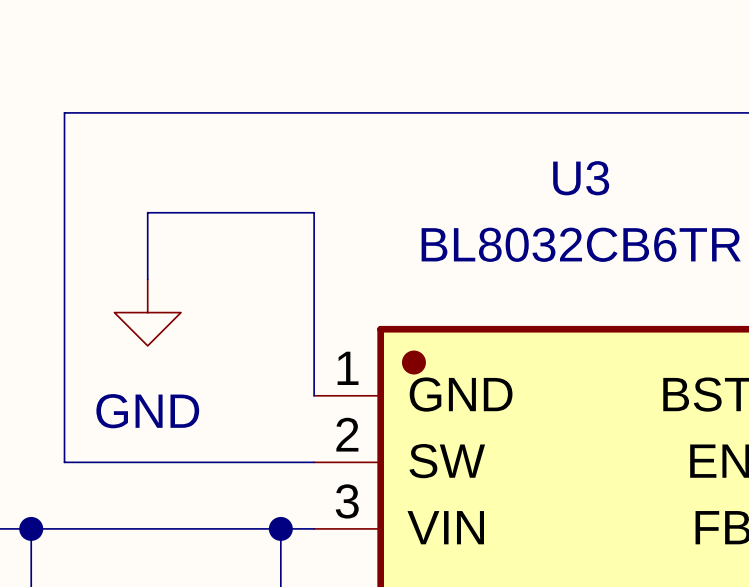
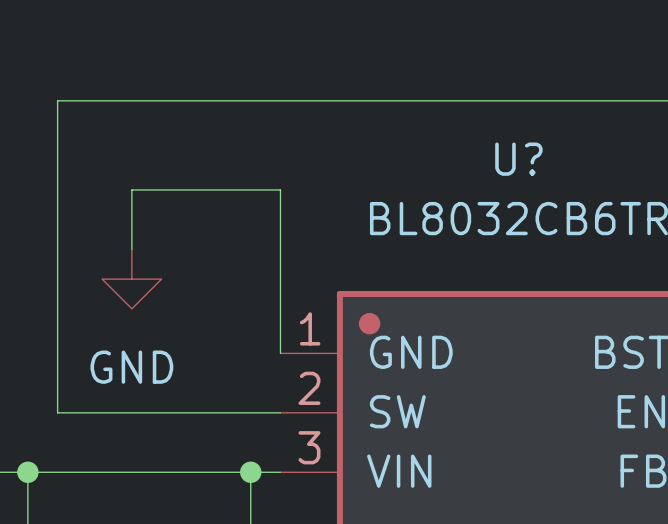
U3 name: U3 (581, 178) -> U? (518, 159)

